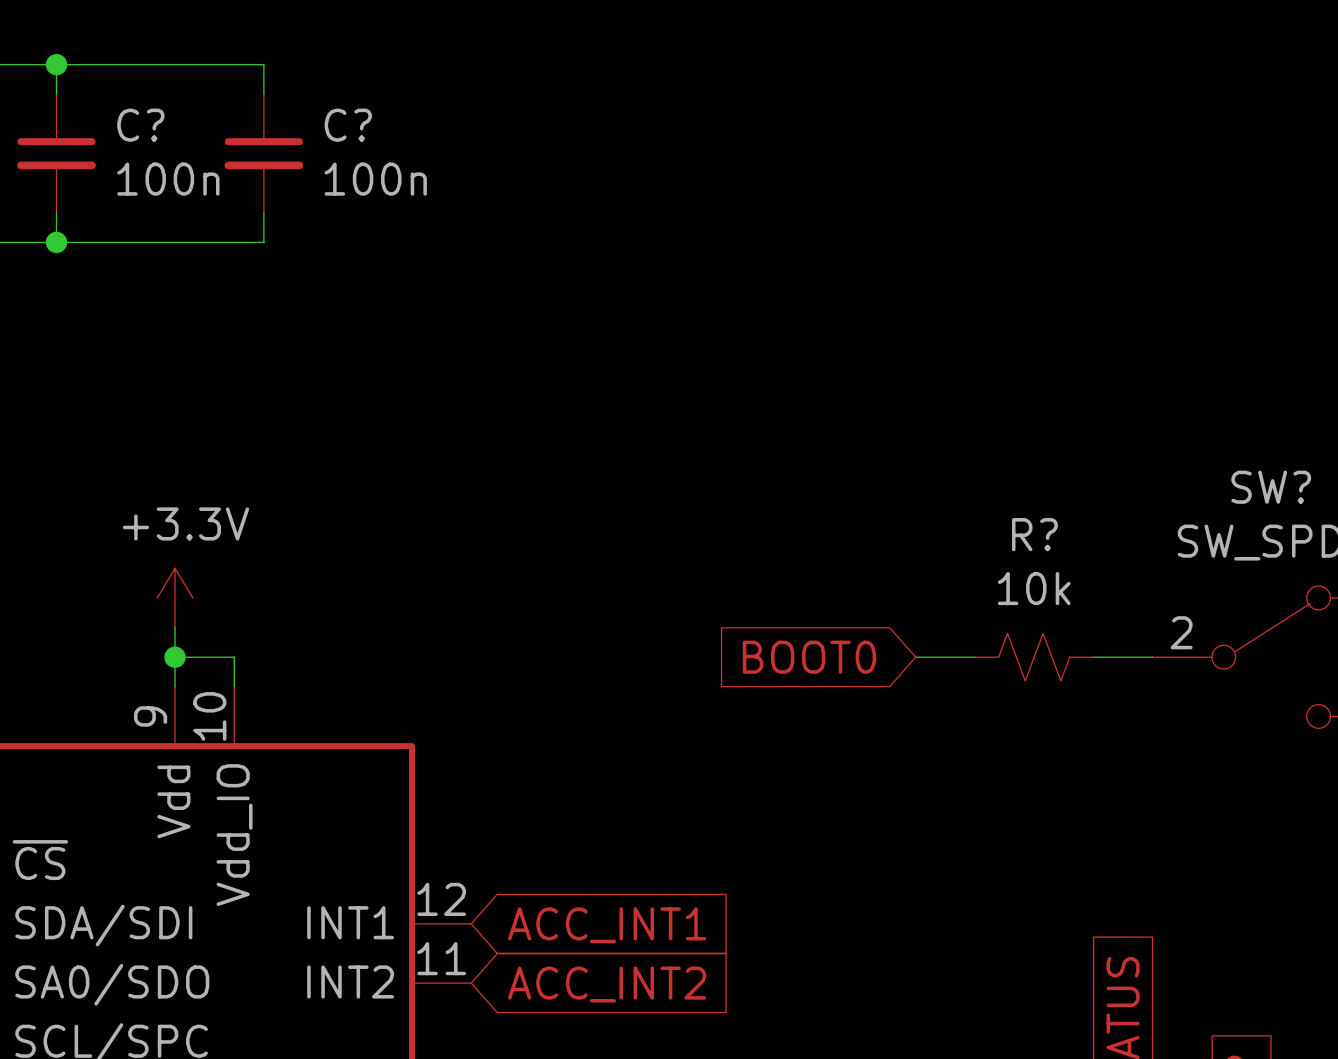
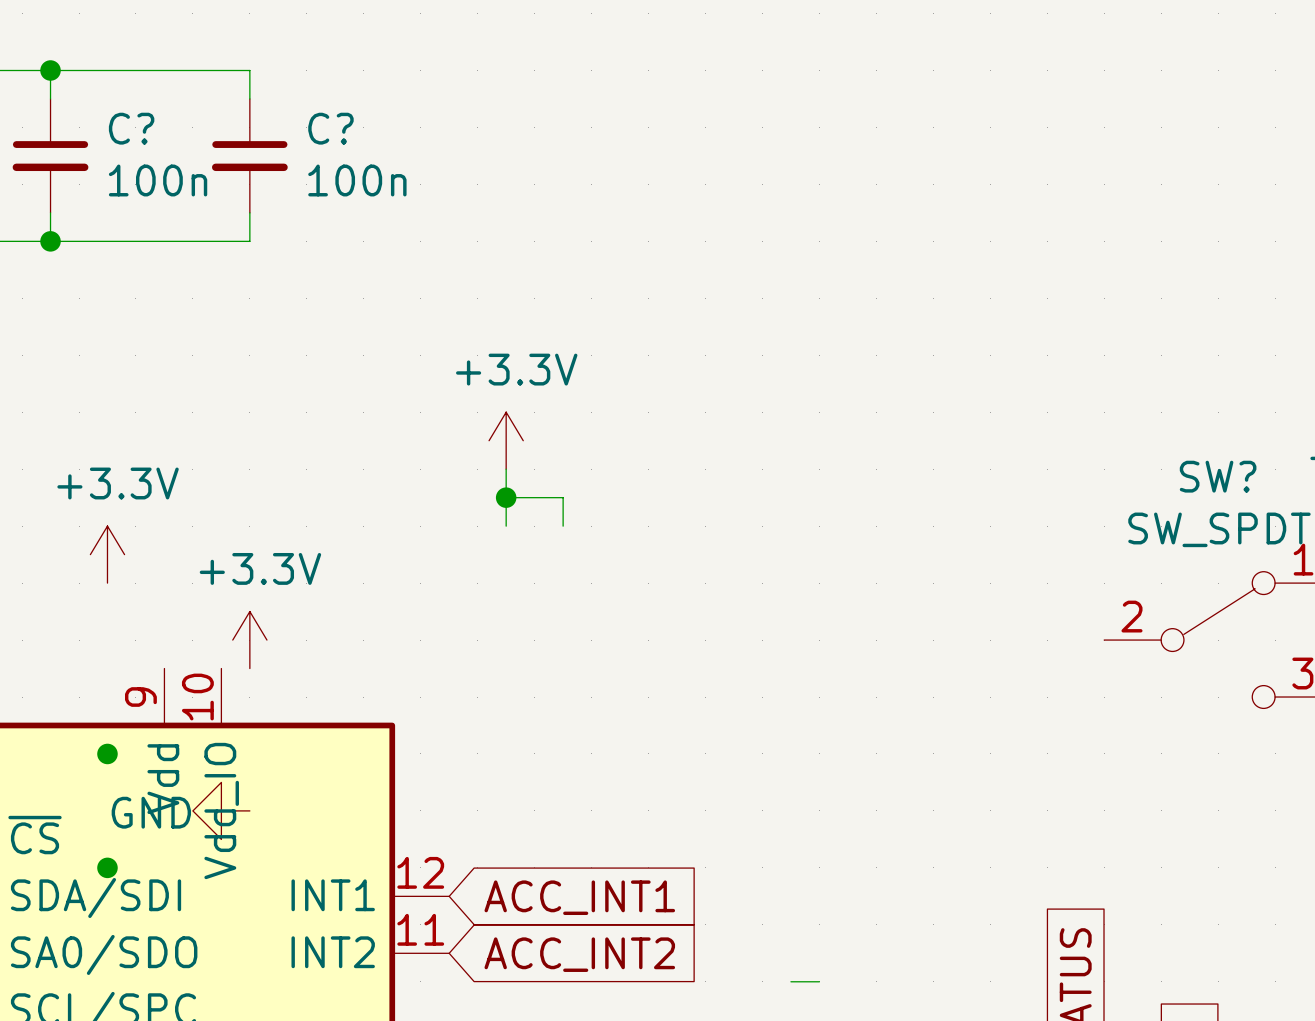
power symbol: none -> +3.3V (506, 440)
junction: none -> (506, 497)
power symbol: none -> +3.3V (107, 554)
power symbol: +3.3V (175, 597) -> none
wire: (175, 627) (175, 686) -> (506, 469) (506, 526)
wire: (175, 657) (234, 657) (234, 686) -> (506, 497) (563, 497) (563, 526)
junction: (175, 657) -> none
power symbol: none -> +3.3V (249, 640)
global label: BOOT0 (809, 657) -> none
wire: (915, 657) (974, 657) -> none
R?: 10k (1034, 657) -> none
wire: (1093, 657) (1152, 657) -> none
junction: none -> (107, 753)
power symbol: none -> GND (221, 810)
junction: none -> (107, 867)
wire: none -> (790, 981) (819, 981)

